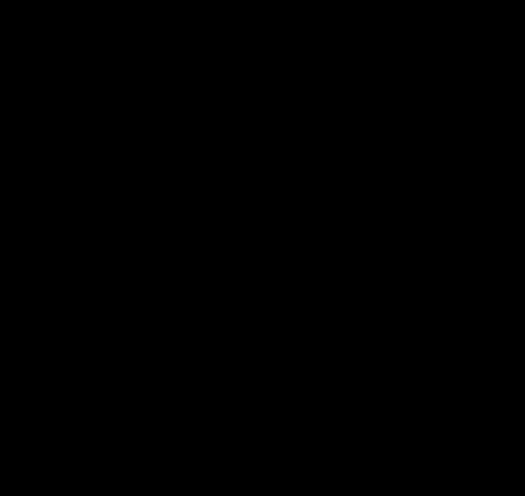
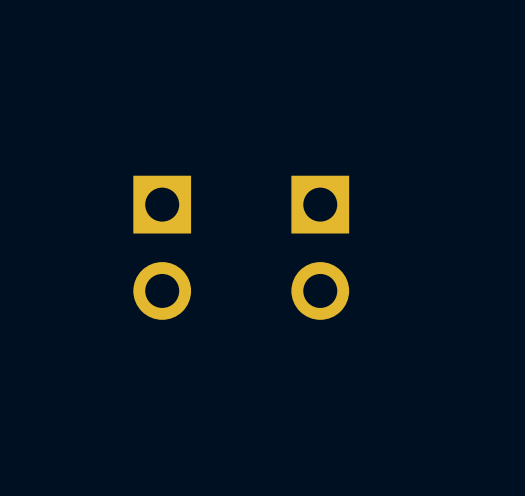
part: none -> (162, 247)
part: none -> (320, 247)

